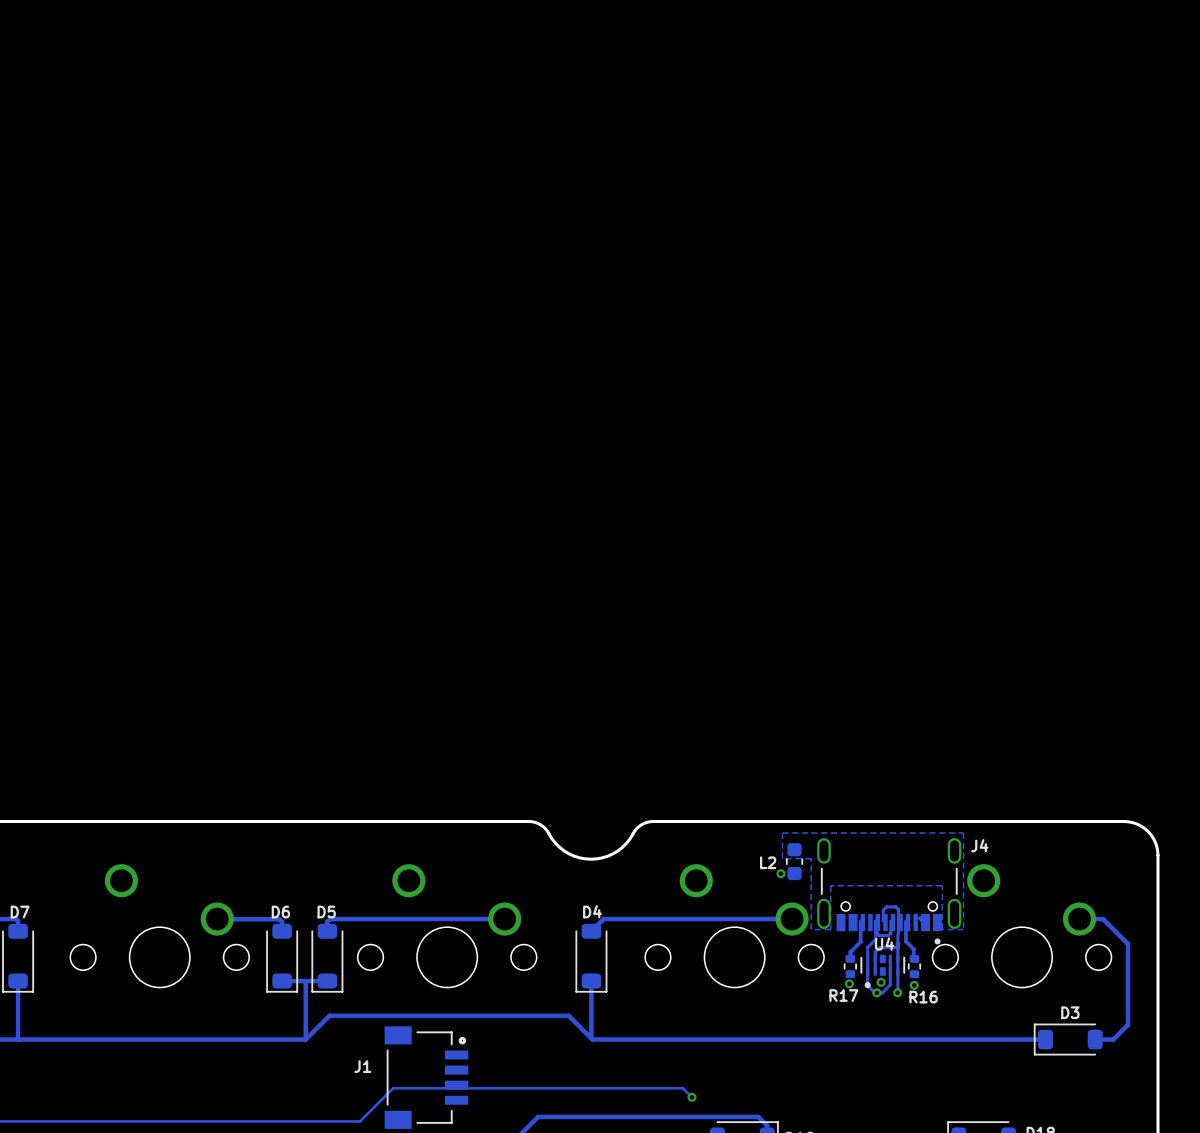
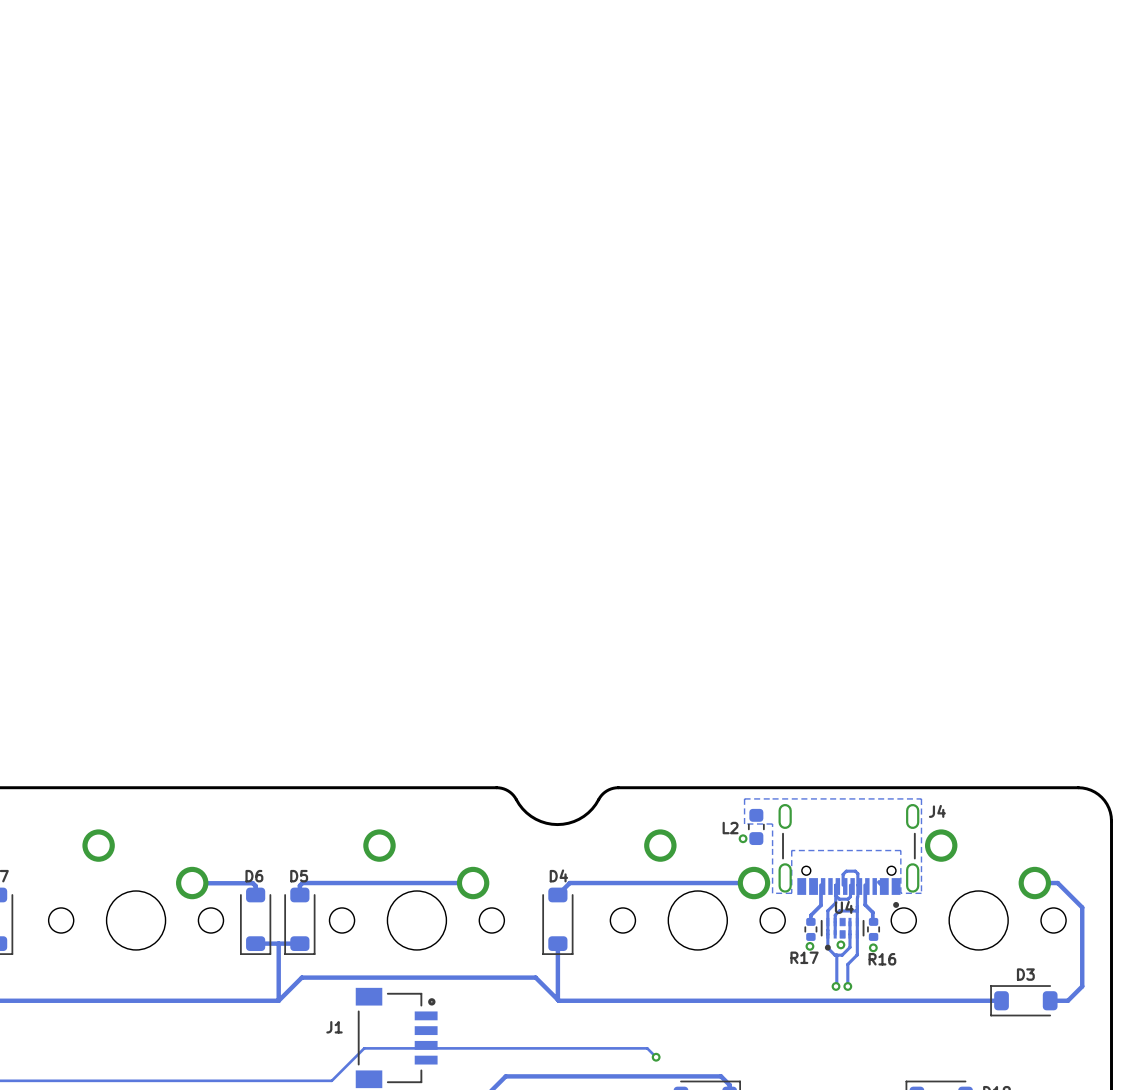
track: none -> (836, 955) (836, 986)
via: (876, 992) -> none
track: none -> (857, 955) (847, 964) (847, 986)
via: (897, 992) -> none
via: none -> (836, 986)
via: none -> (847, 986)

